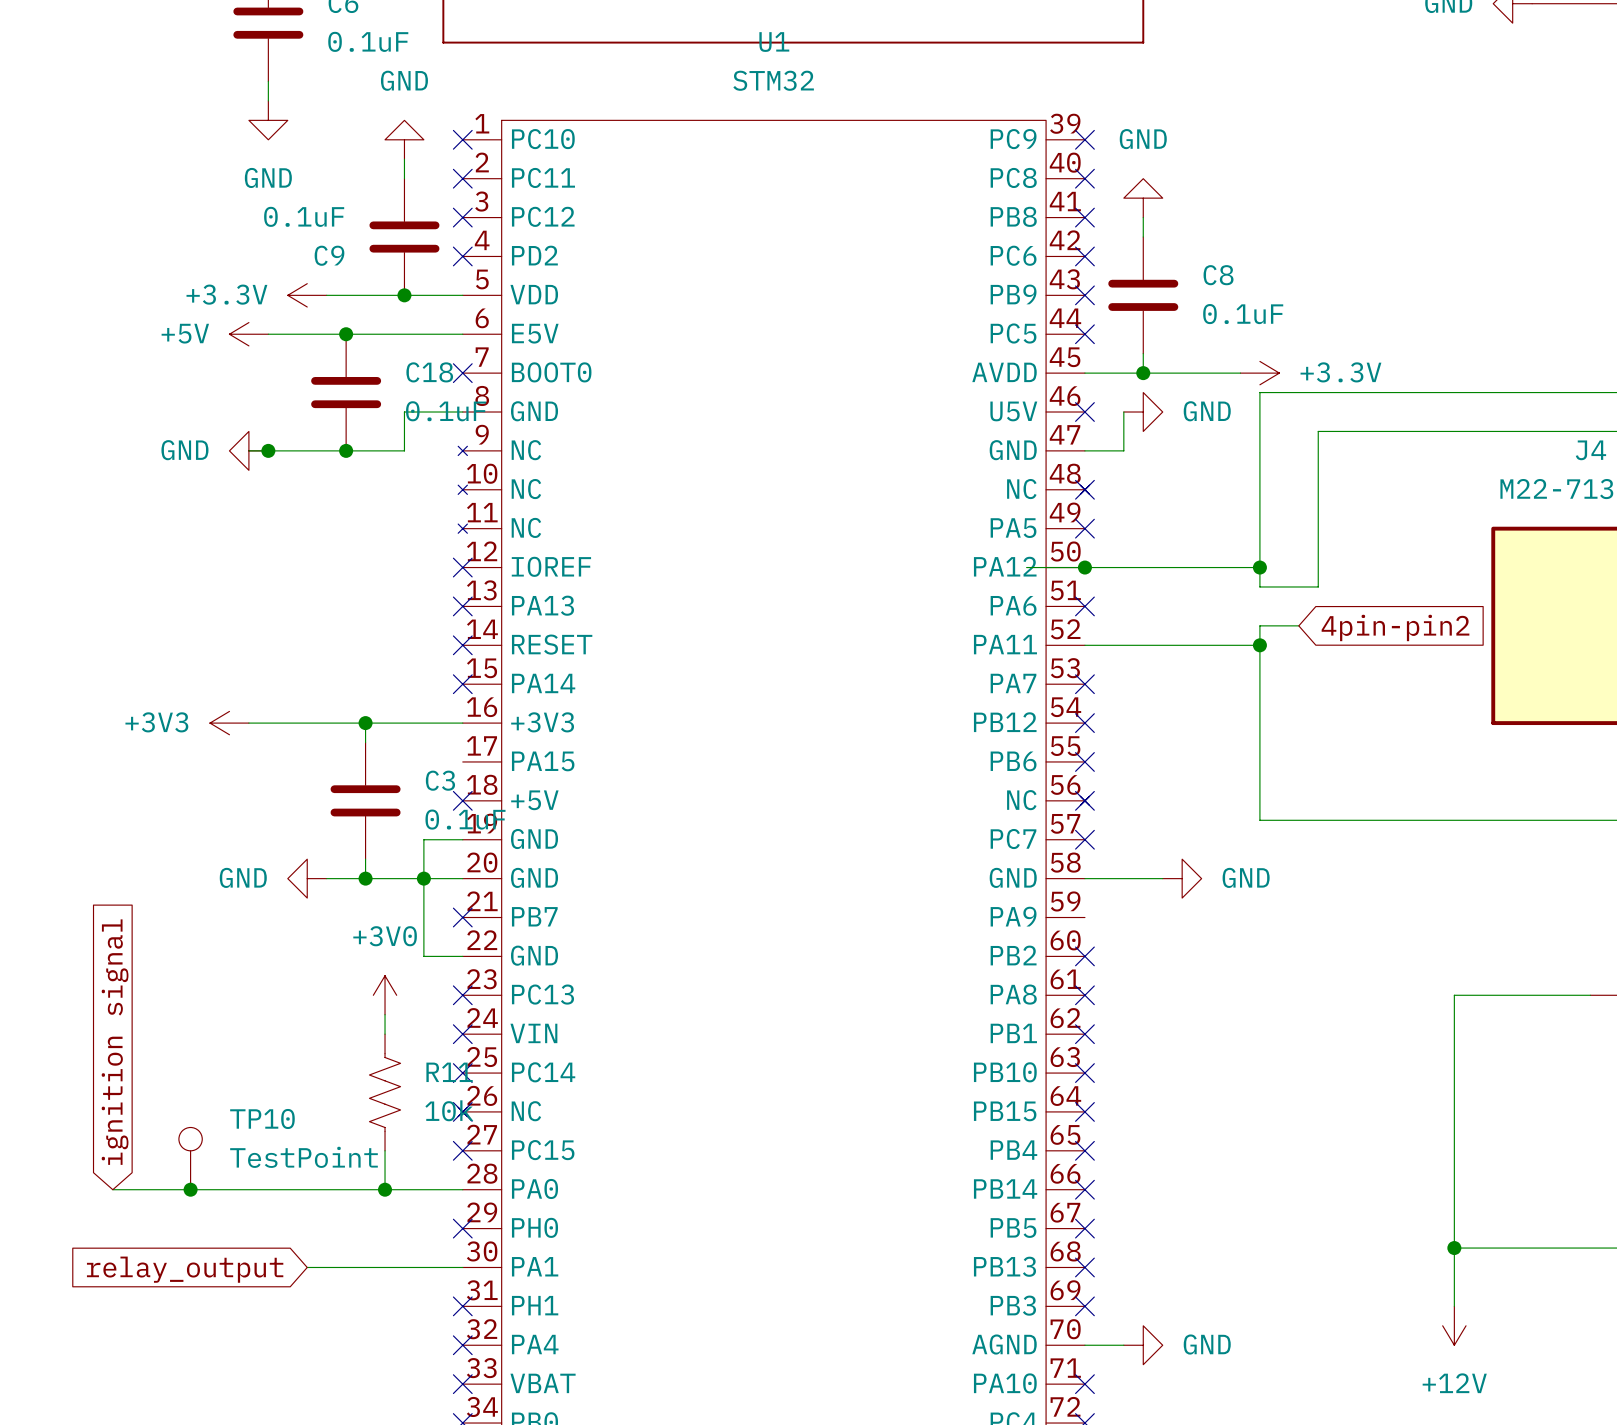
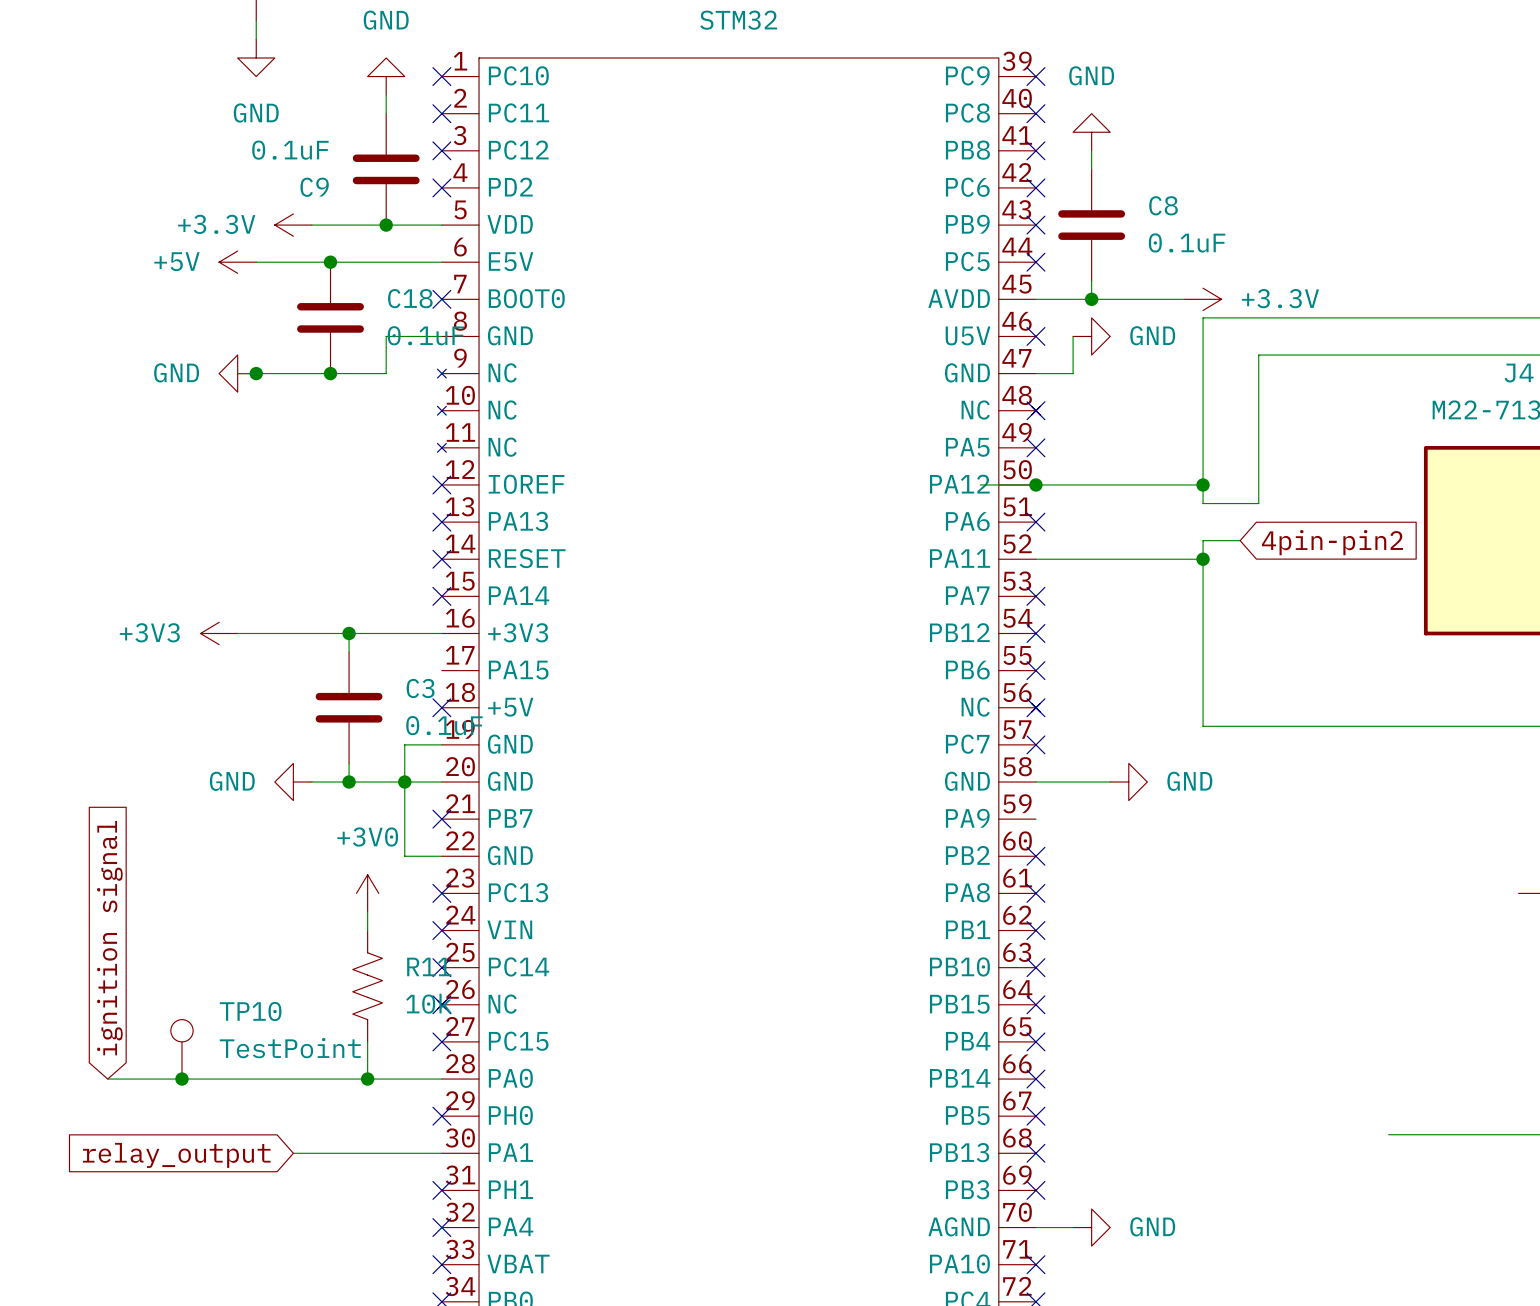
wire: (1590, 995) (1454, 995) (1454, 1306) -> none
junction: (1454, 1248) -> none
power symbol: +12V (1454, 1325) -> none

